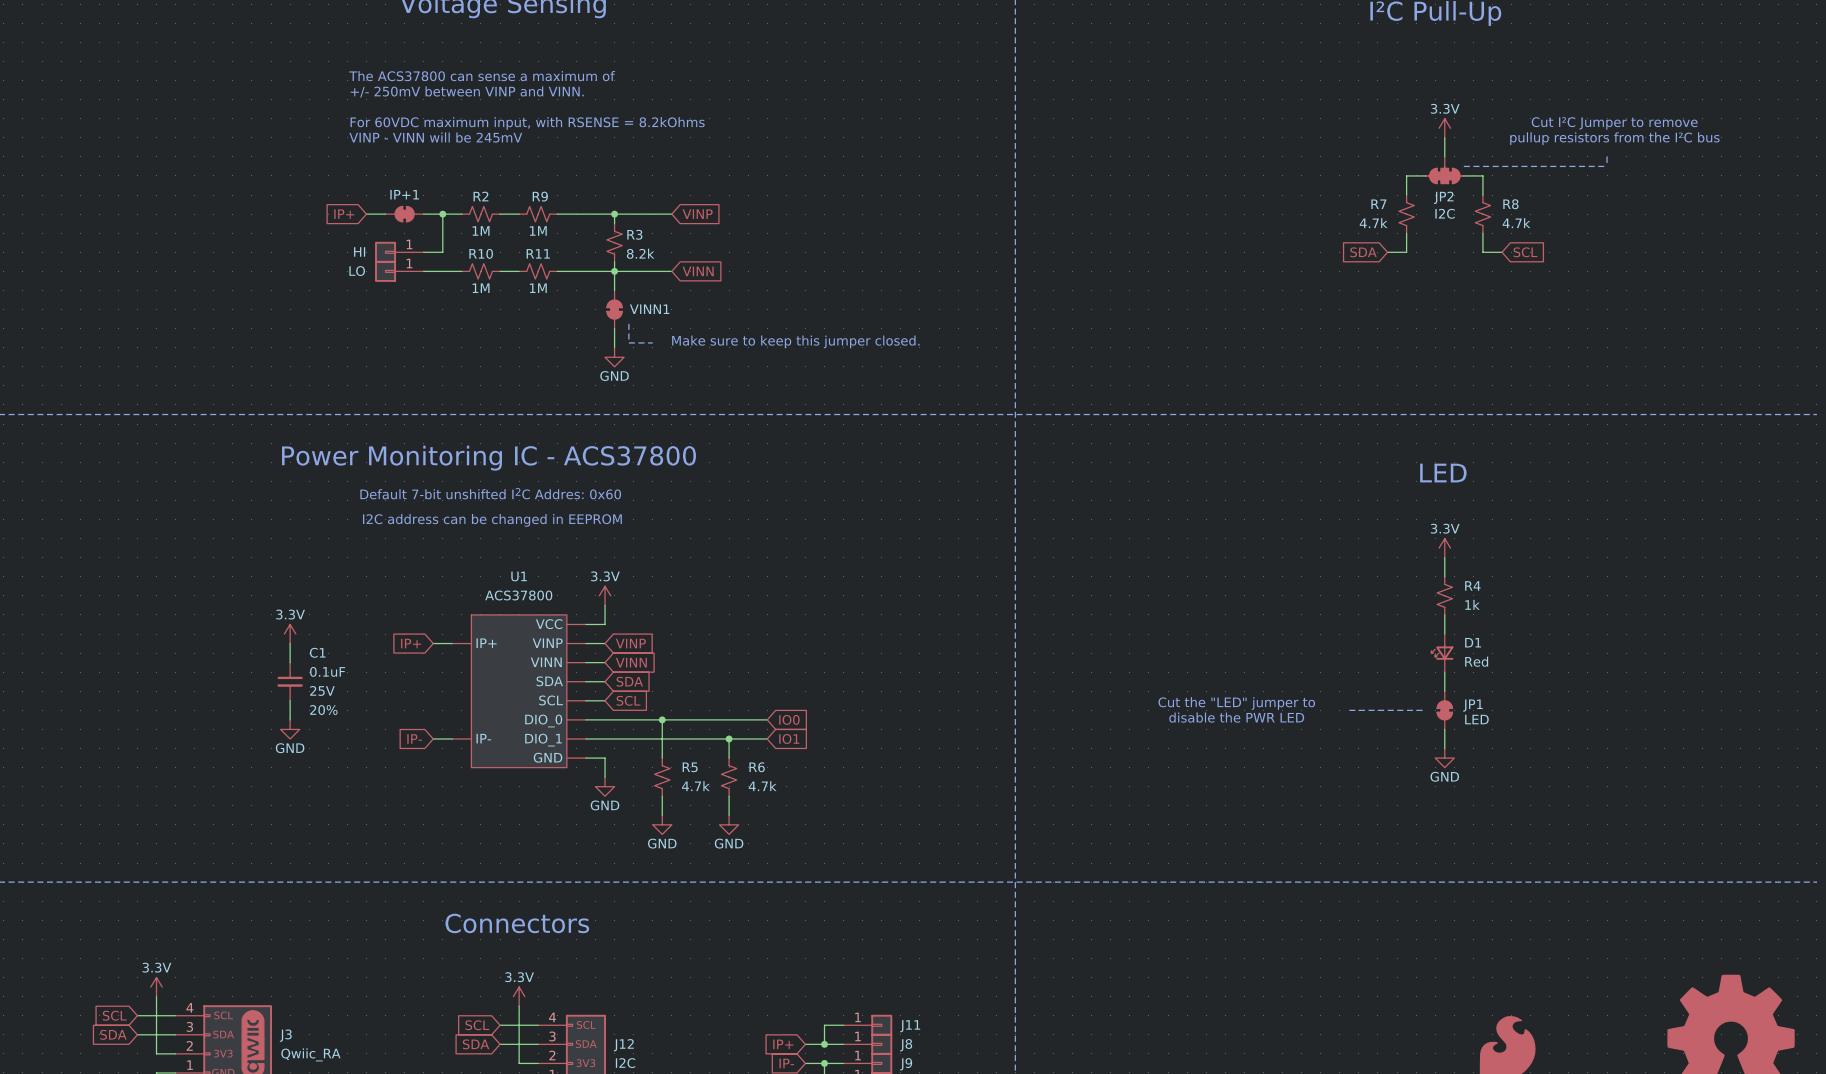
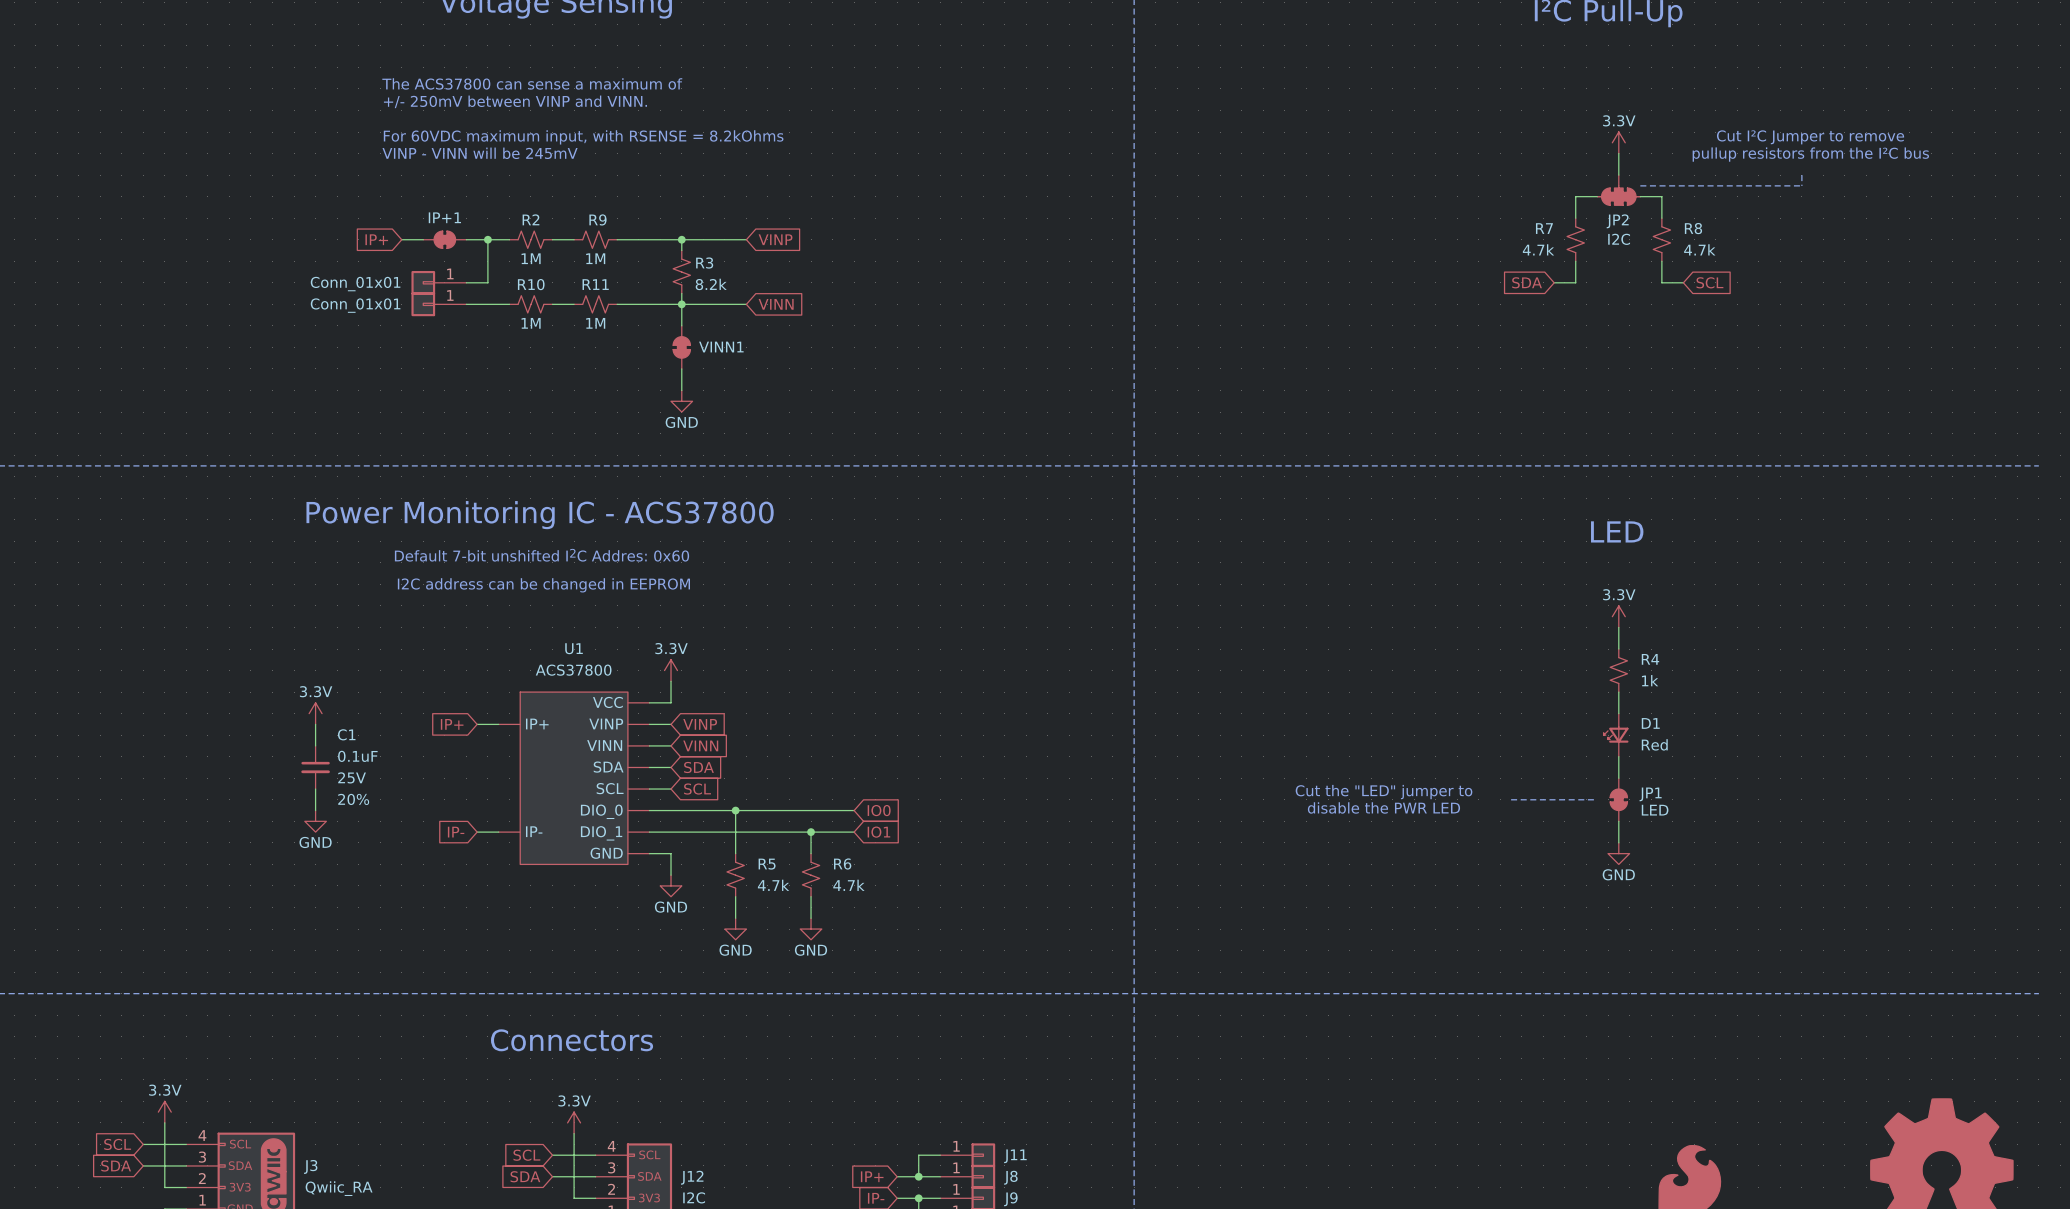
part value: HI (359, 251) -> Conn_01x01 (355, 284)
part value: LO (357, 271) -> Conn_01x01 (355, 305)
line: (628, 323) (628, 342) (652, 342) -> none
text: Make sure to keep this jumper closed. (795, 341) -> none

